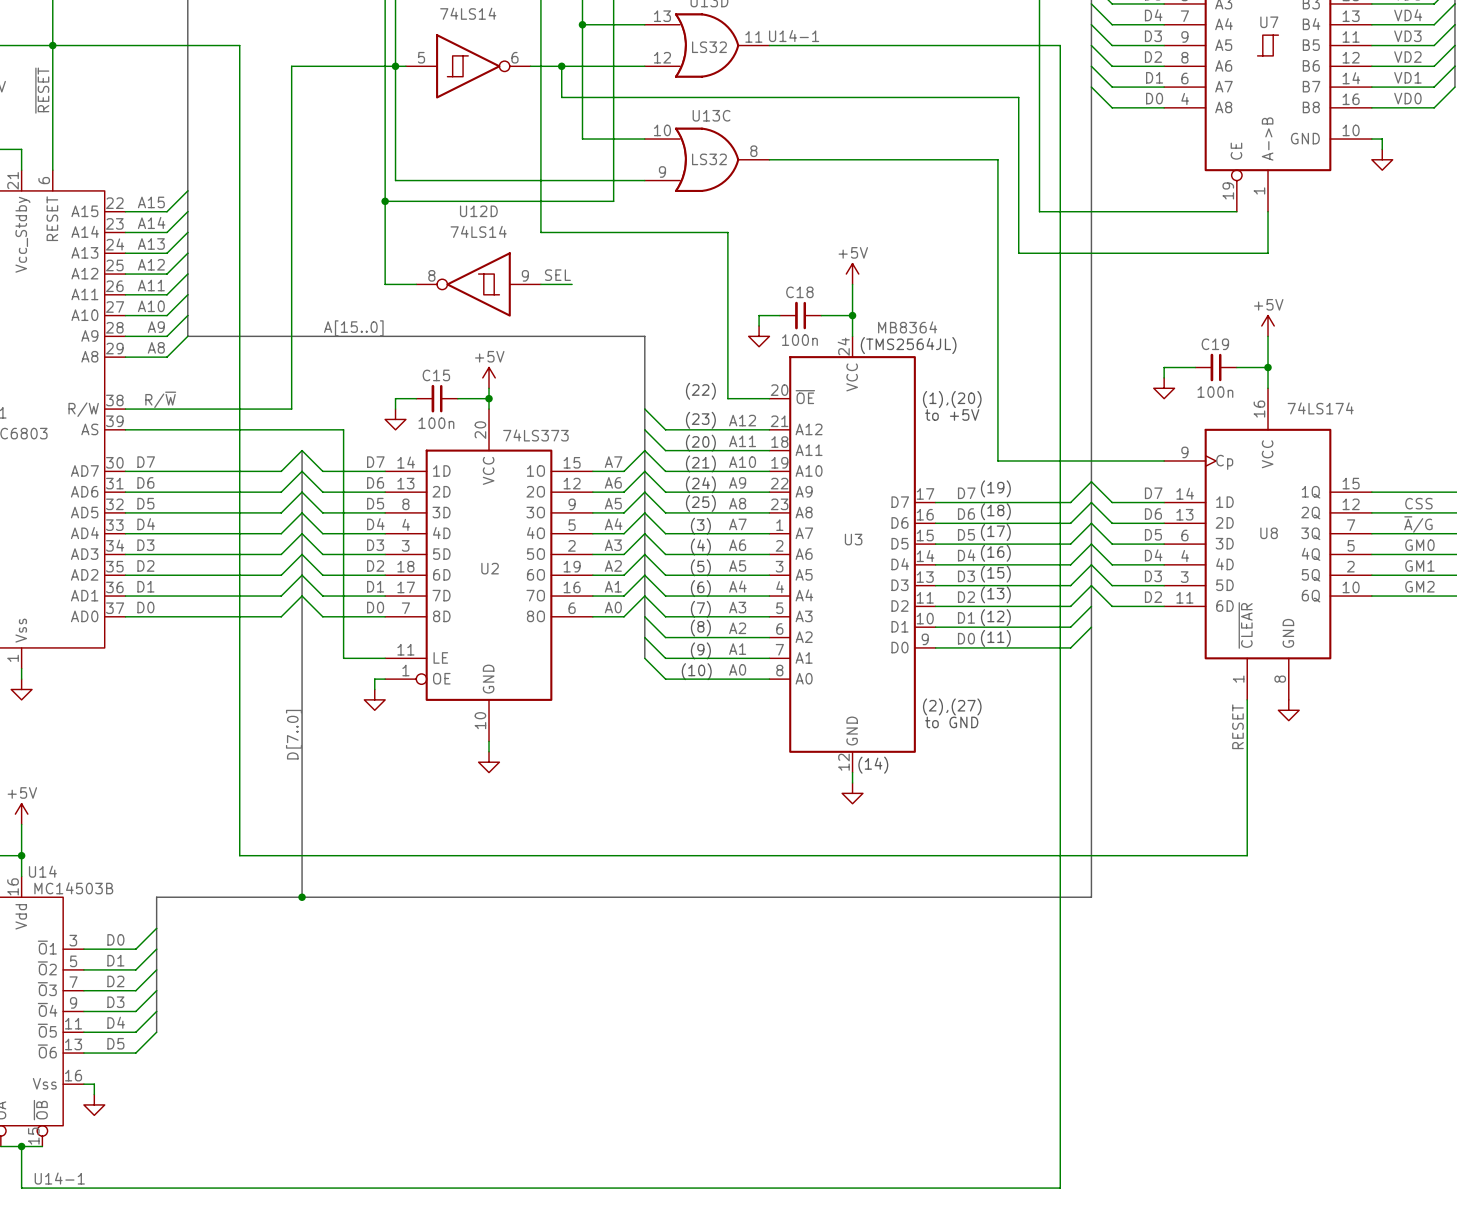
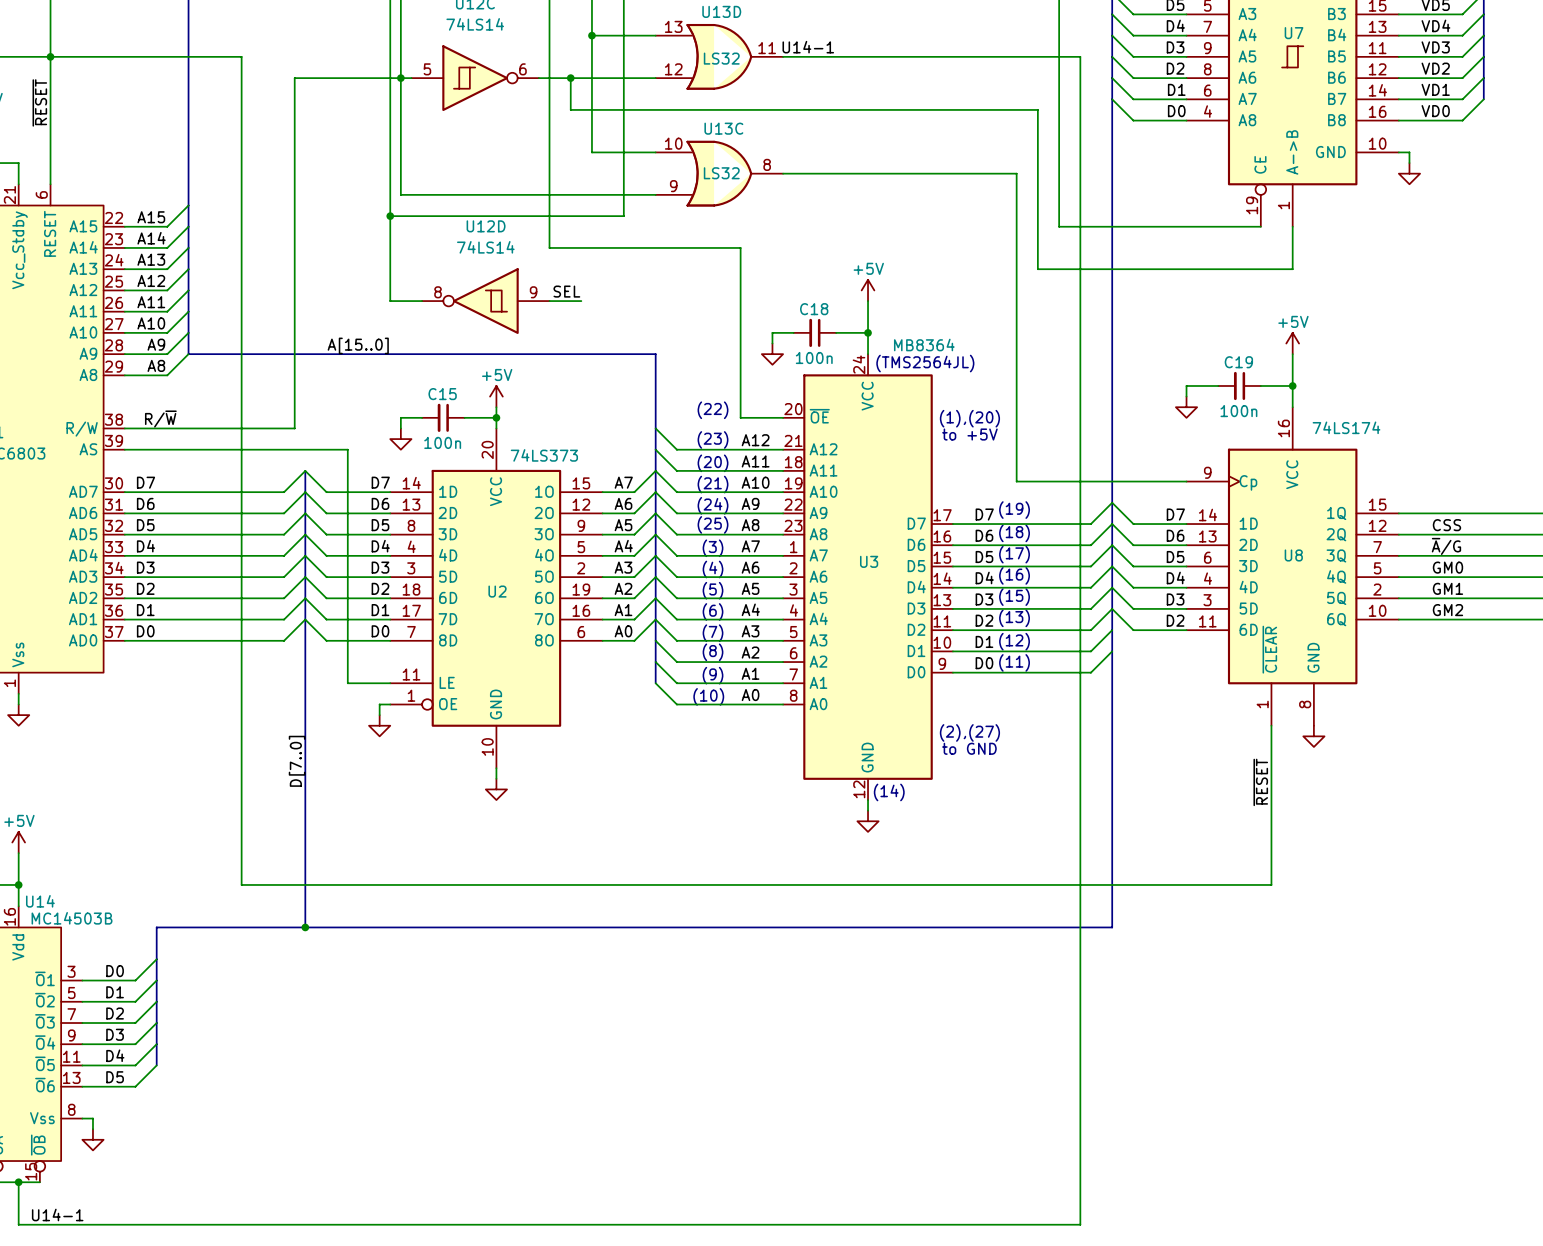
label: RESET (1237, 726) -> ~{RESET} (1260, 782)
U14 pin number: 16 (73, 1075) -> 8 (71, 1109)

